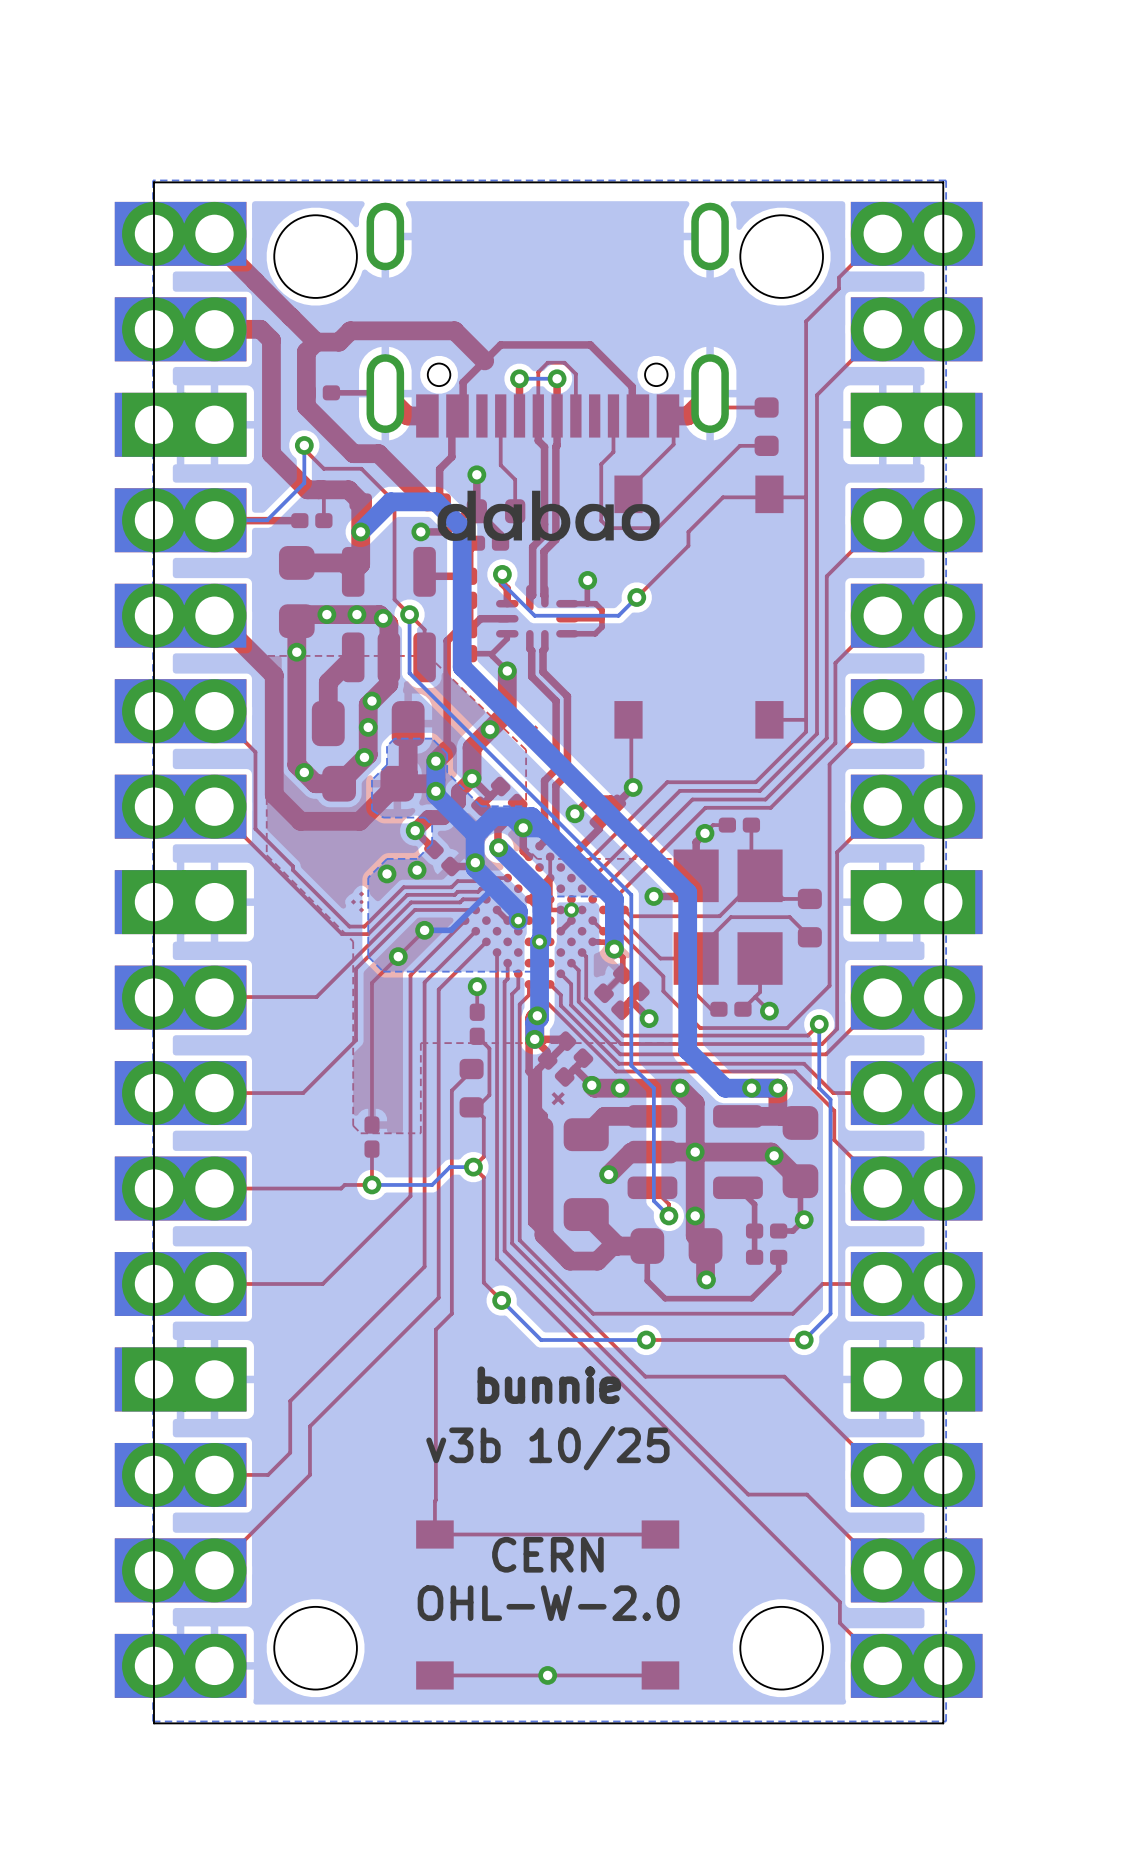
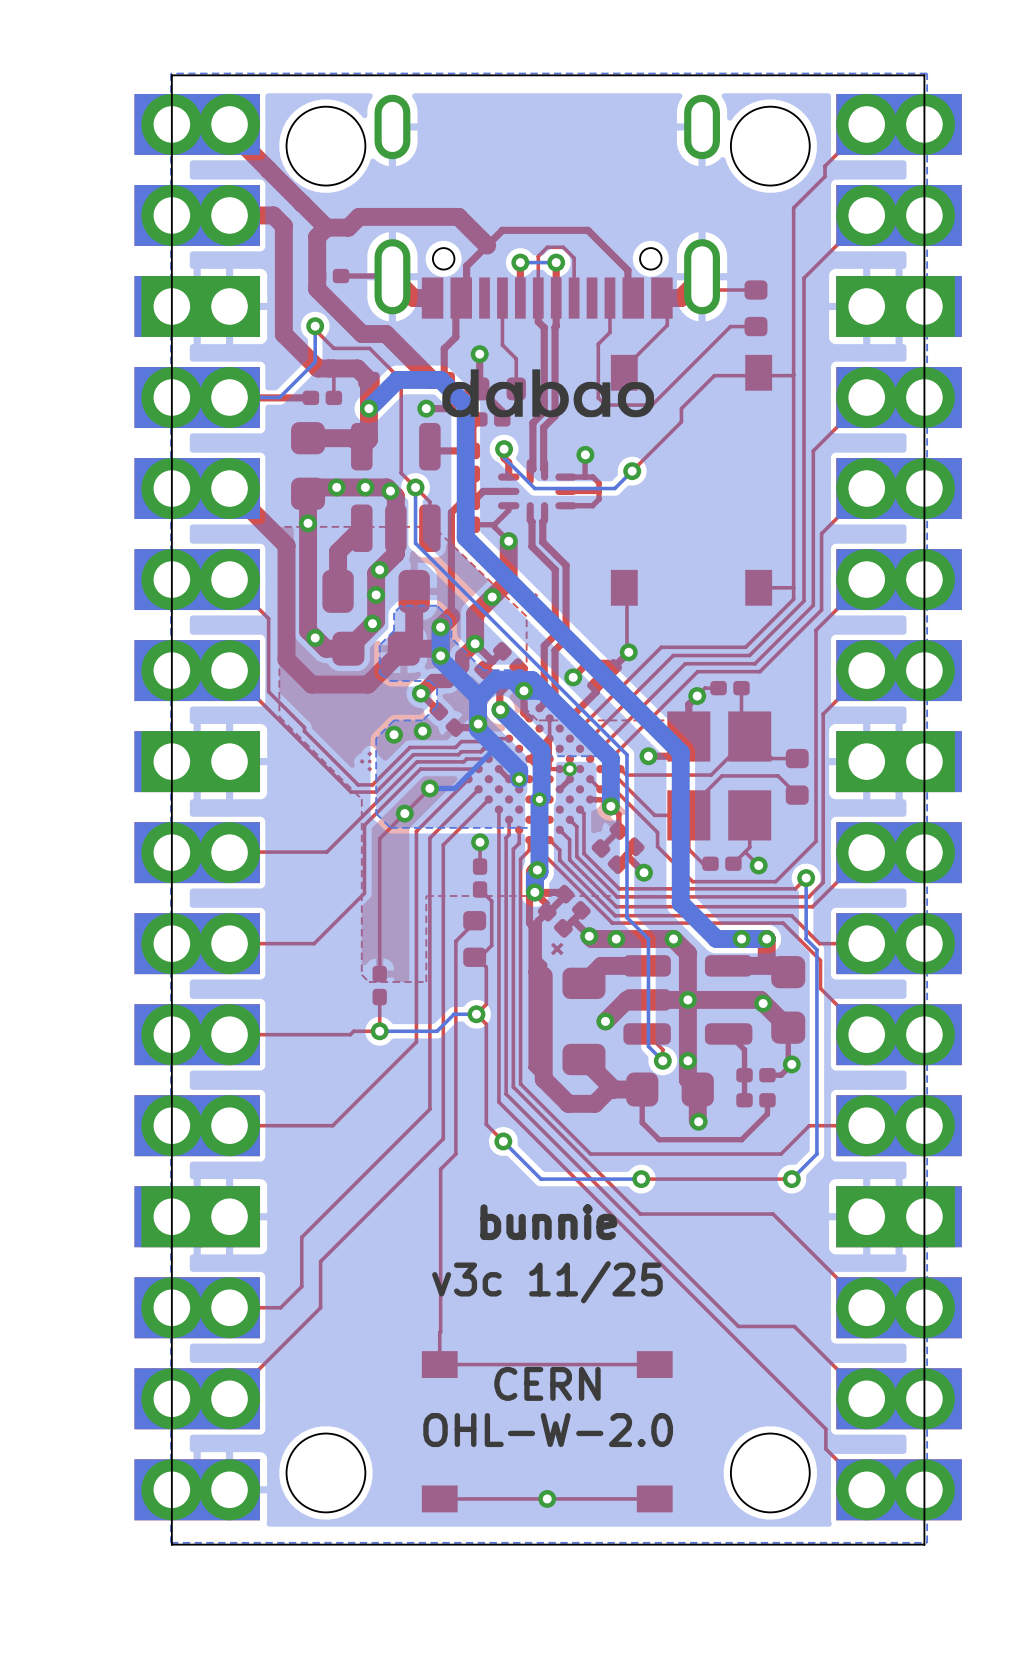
text: v3b 10/25 (547, 1448) -> v3c 11/25 (547, 1282)

